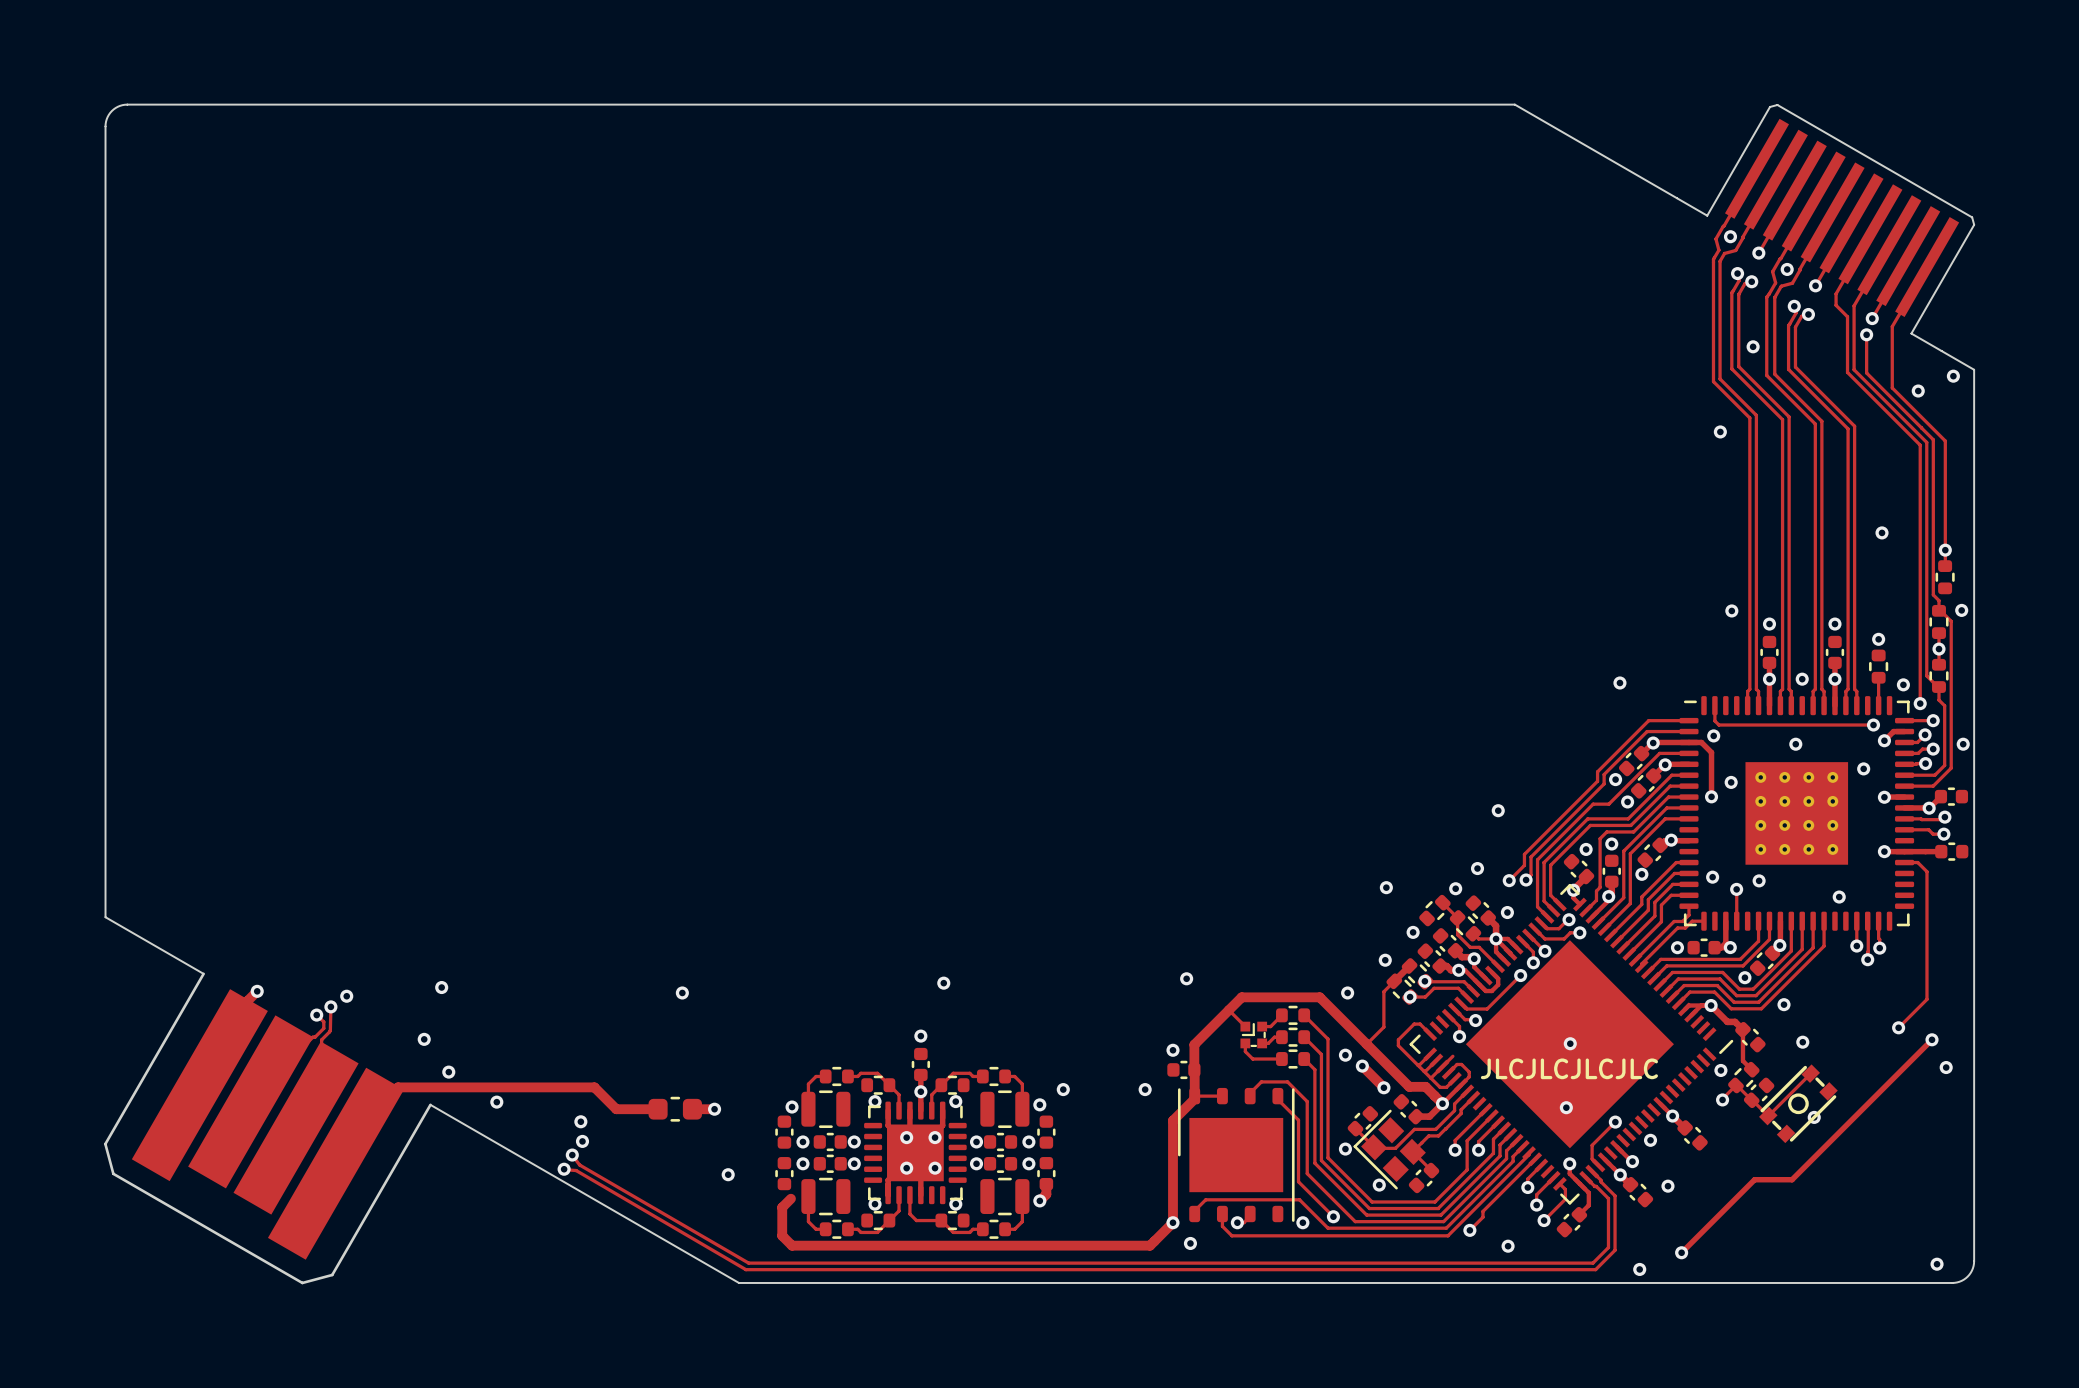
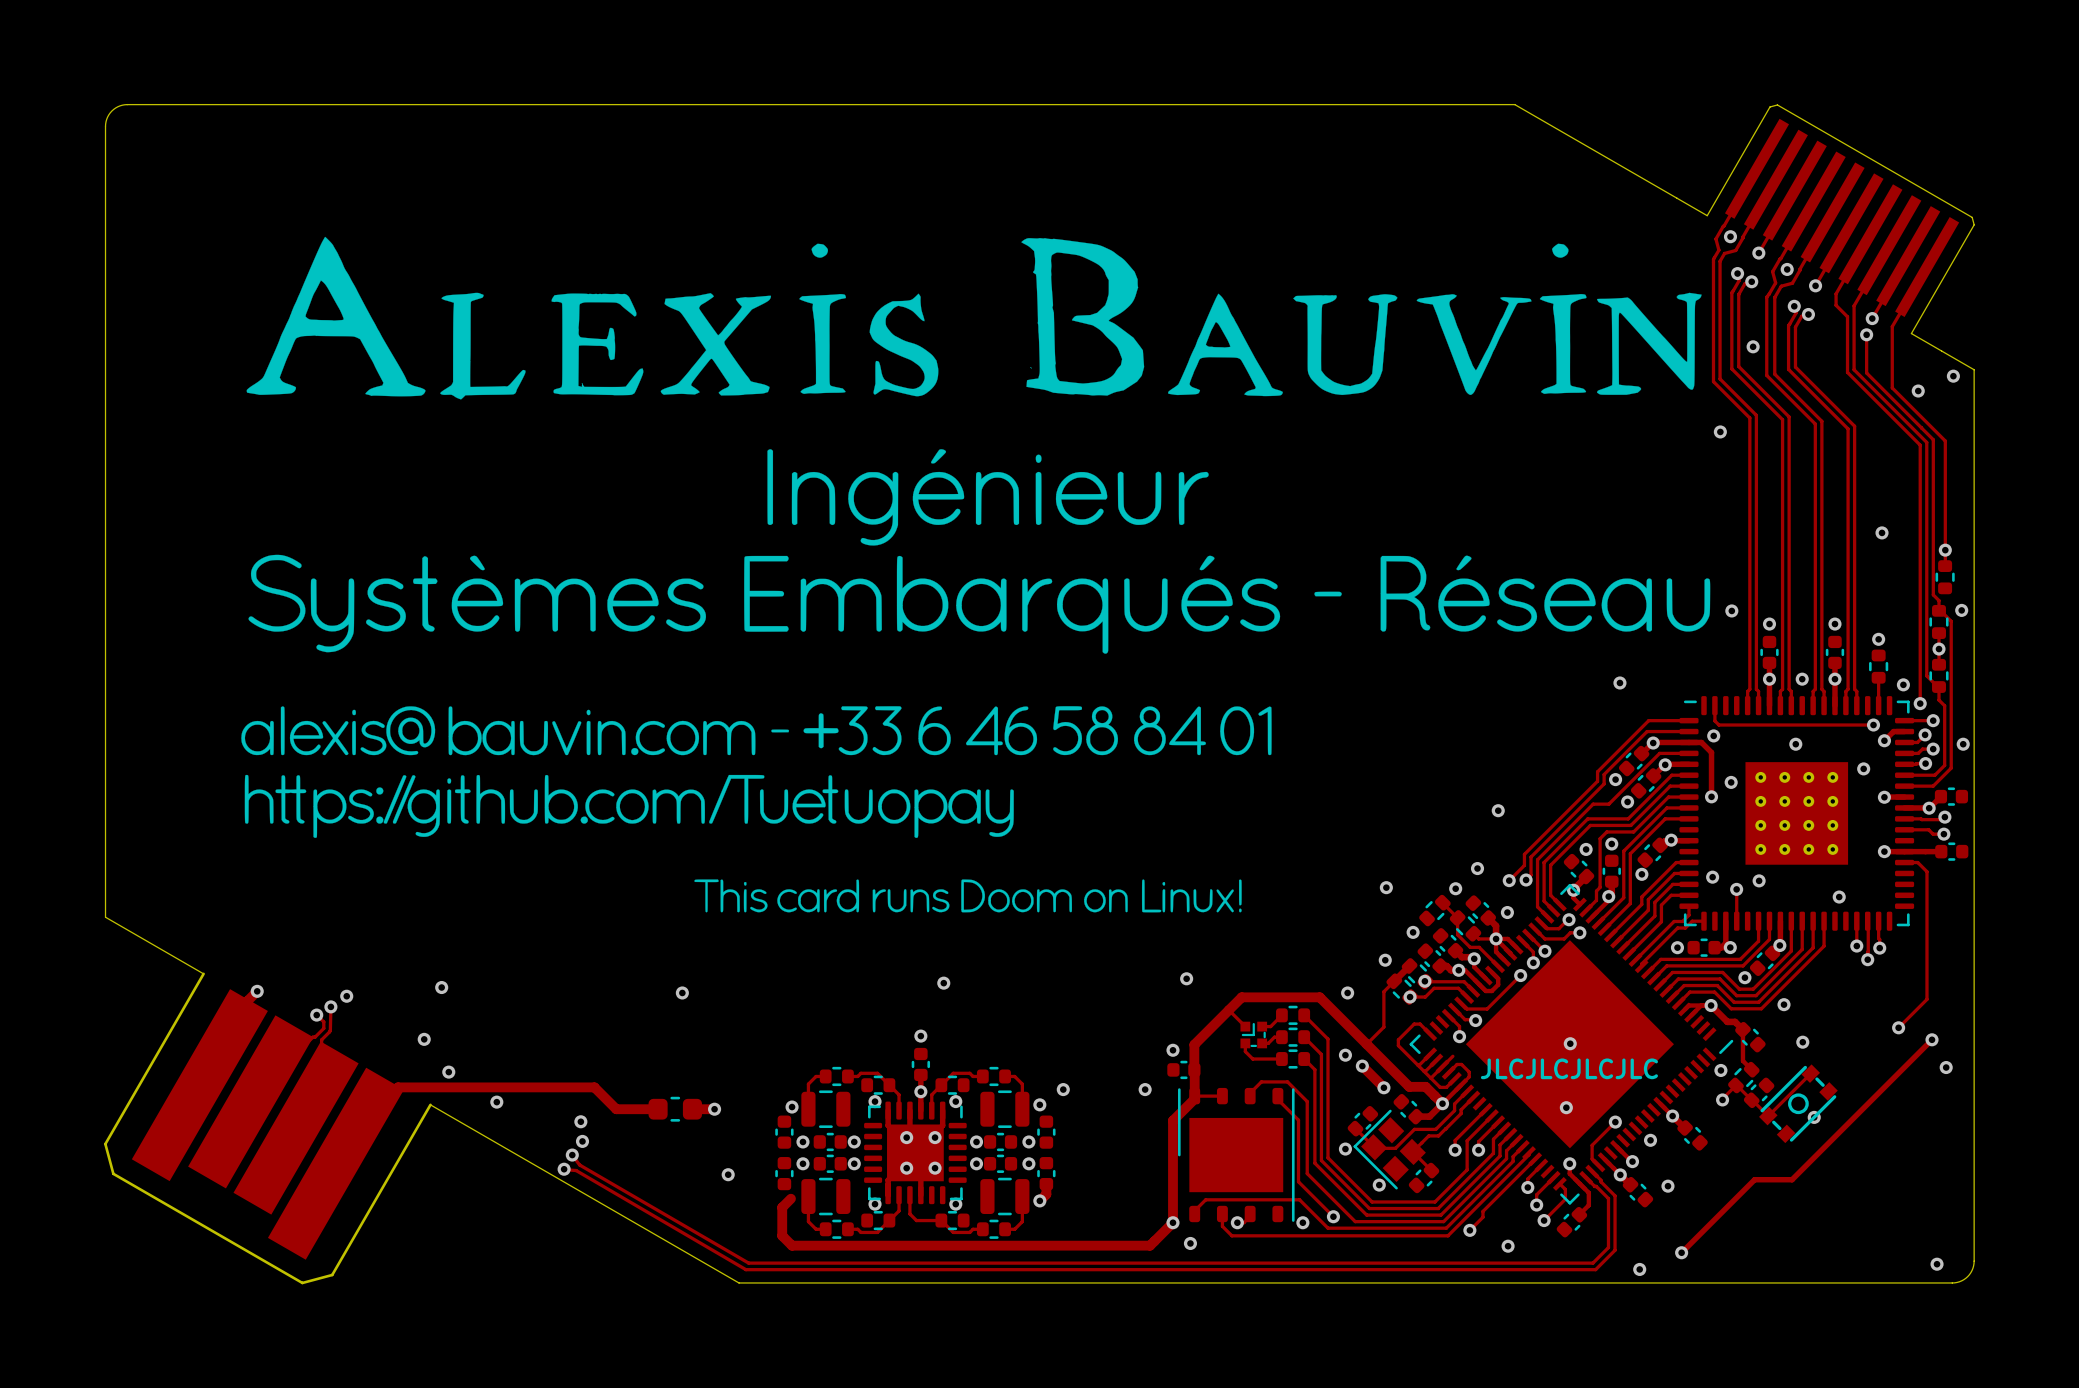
drawing: none -> [241, 236, 1711, 913]

